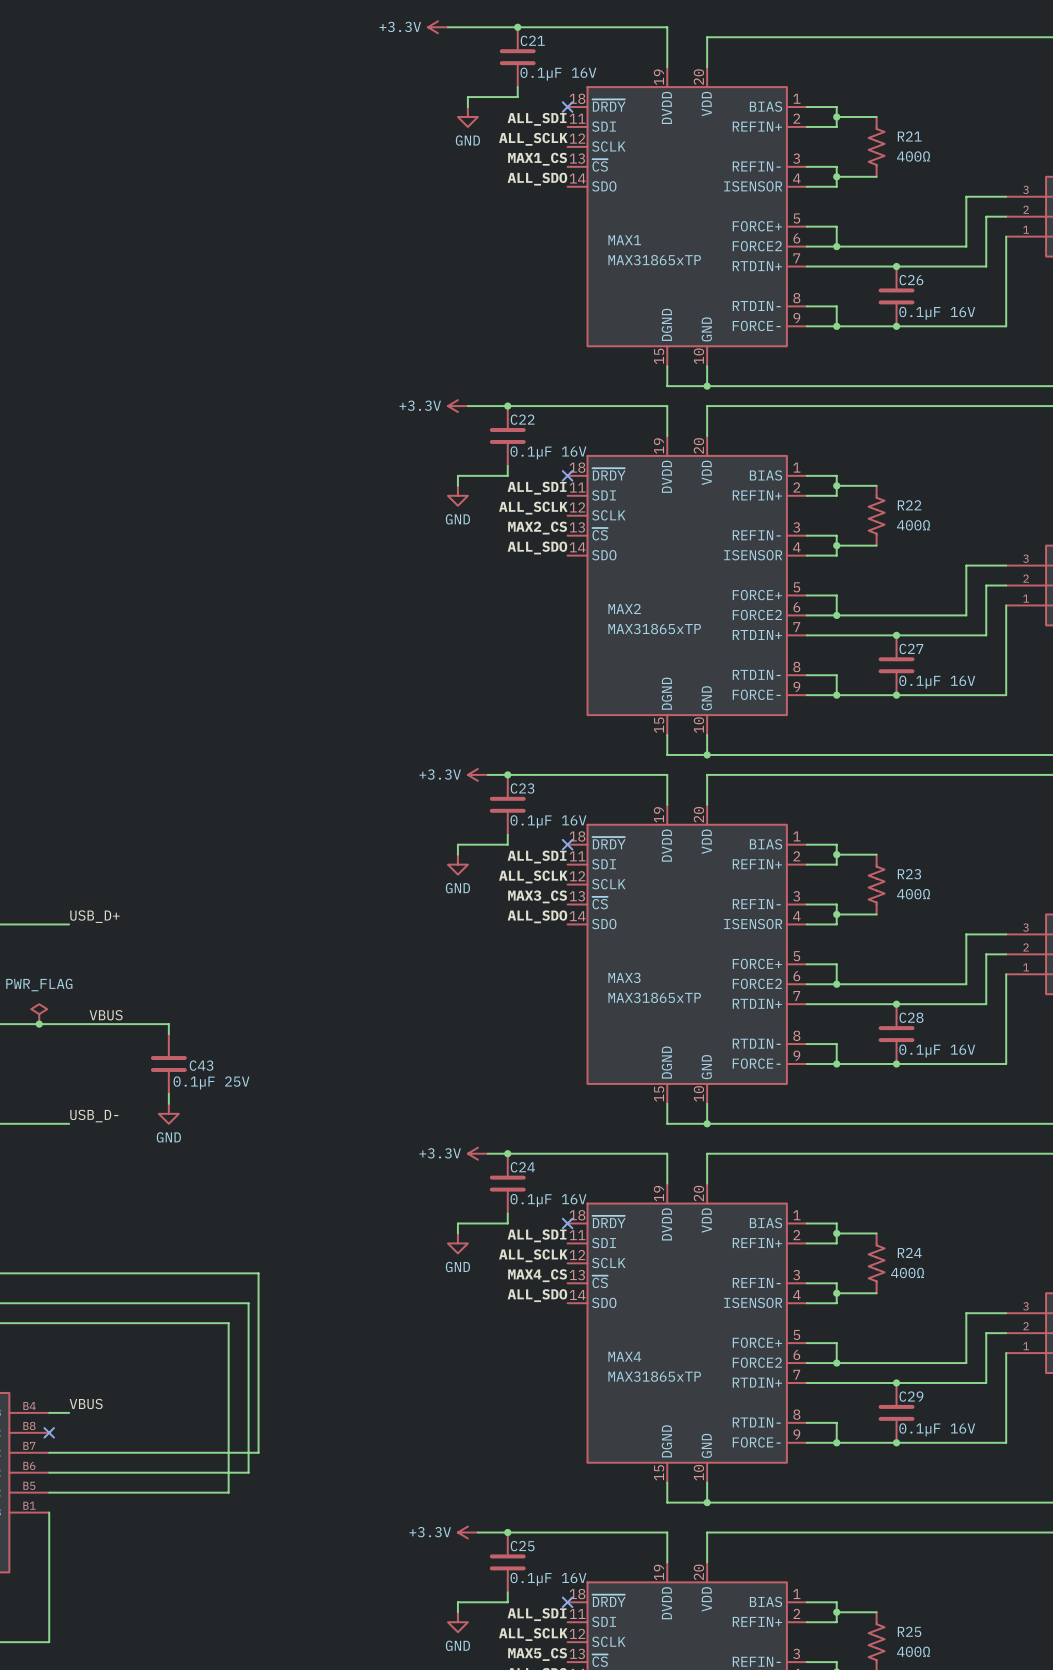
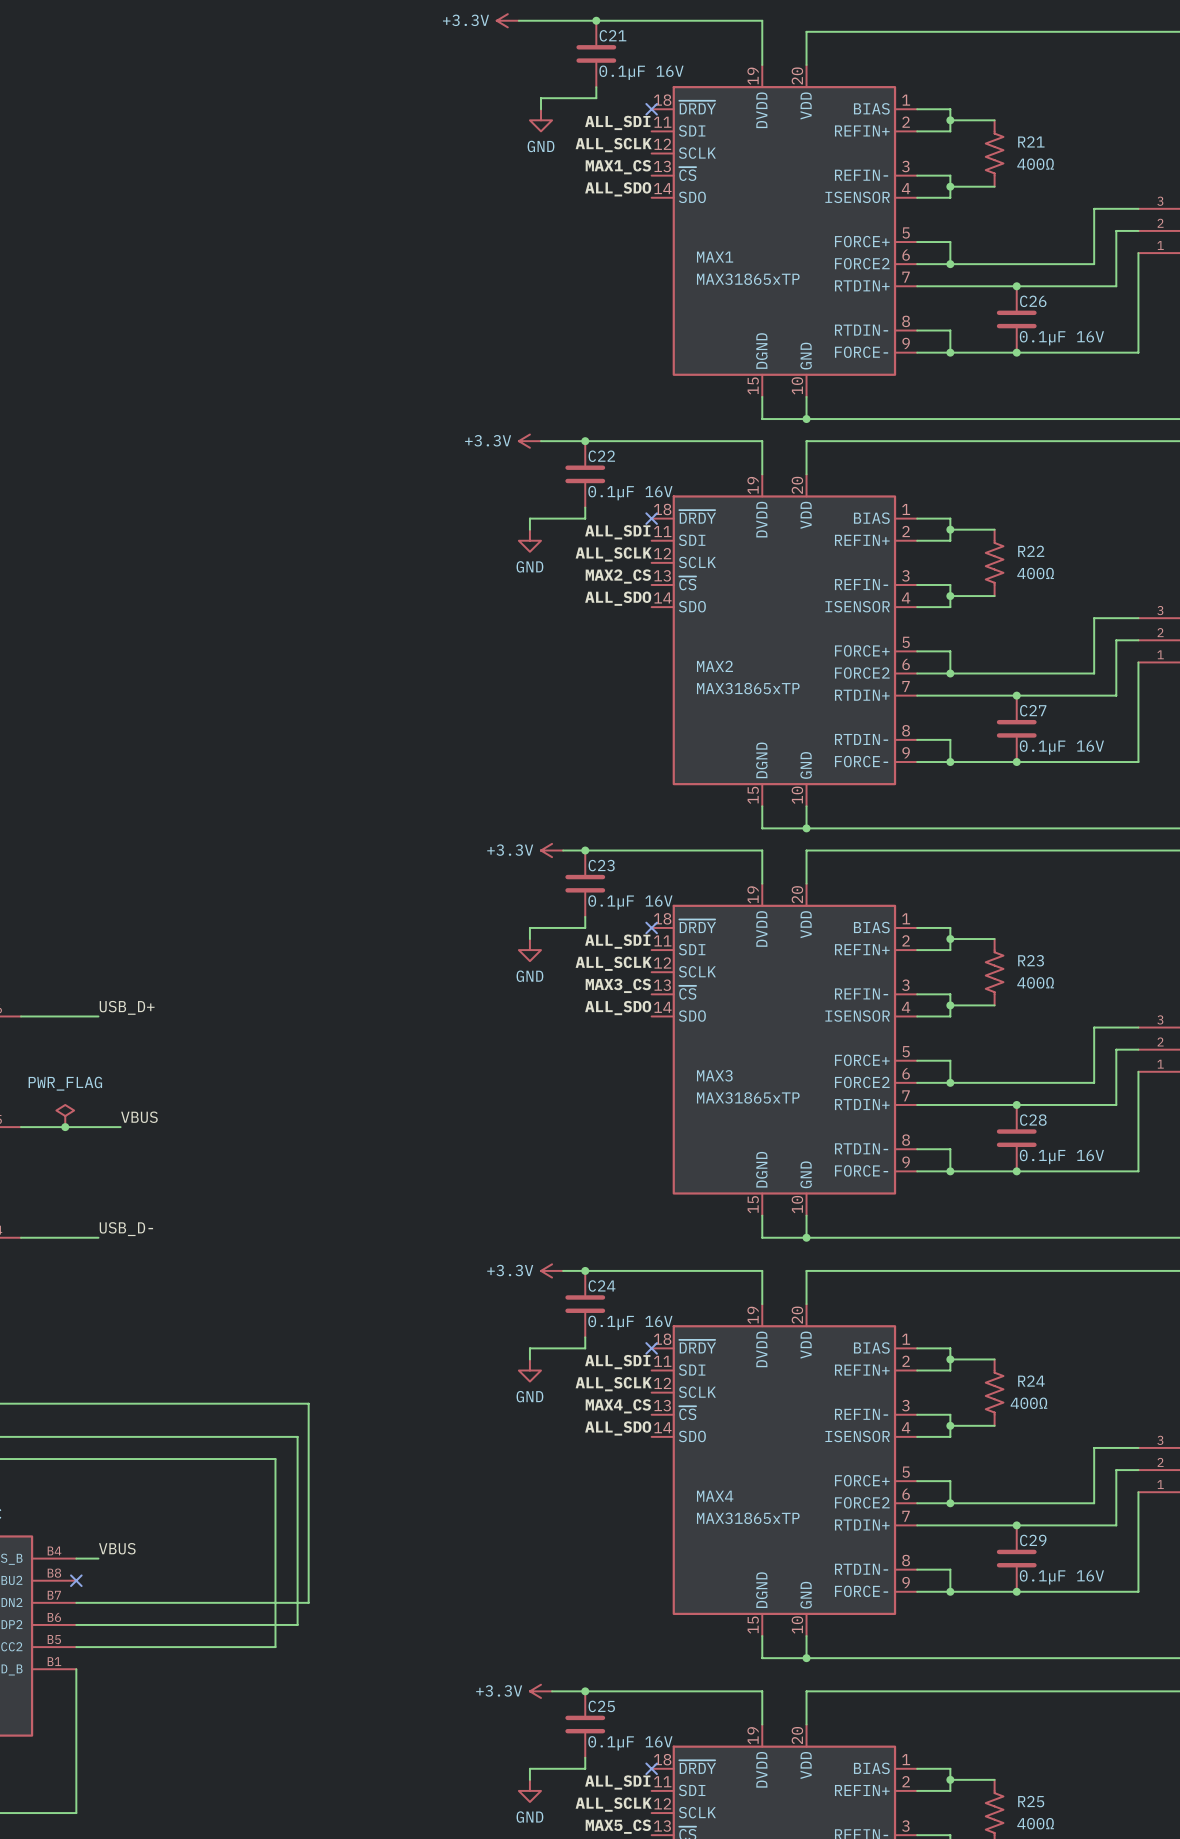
wire: (89, 1024) (168, 1024) (168, 1034) -> none
C43: 0.1µF 25V (168, 1064) -> none
wire: (168, 1093) (168, 1103) -> none
power symbol: GND (168, 1113) -> none

